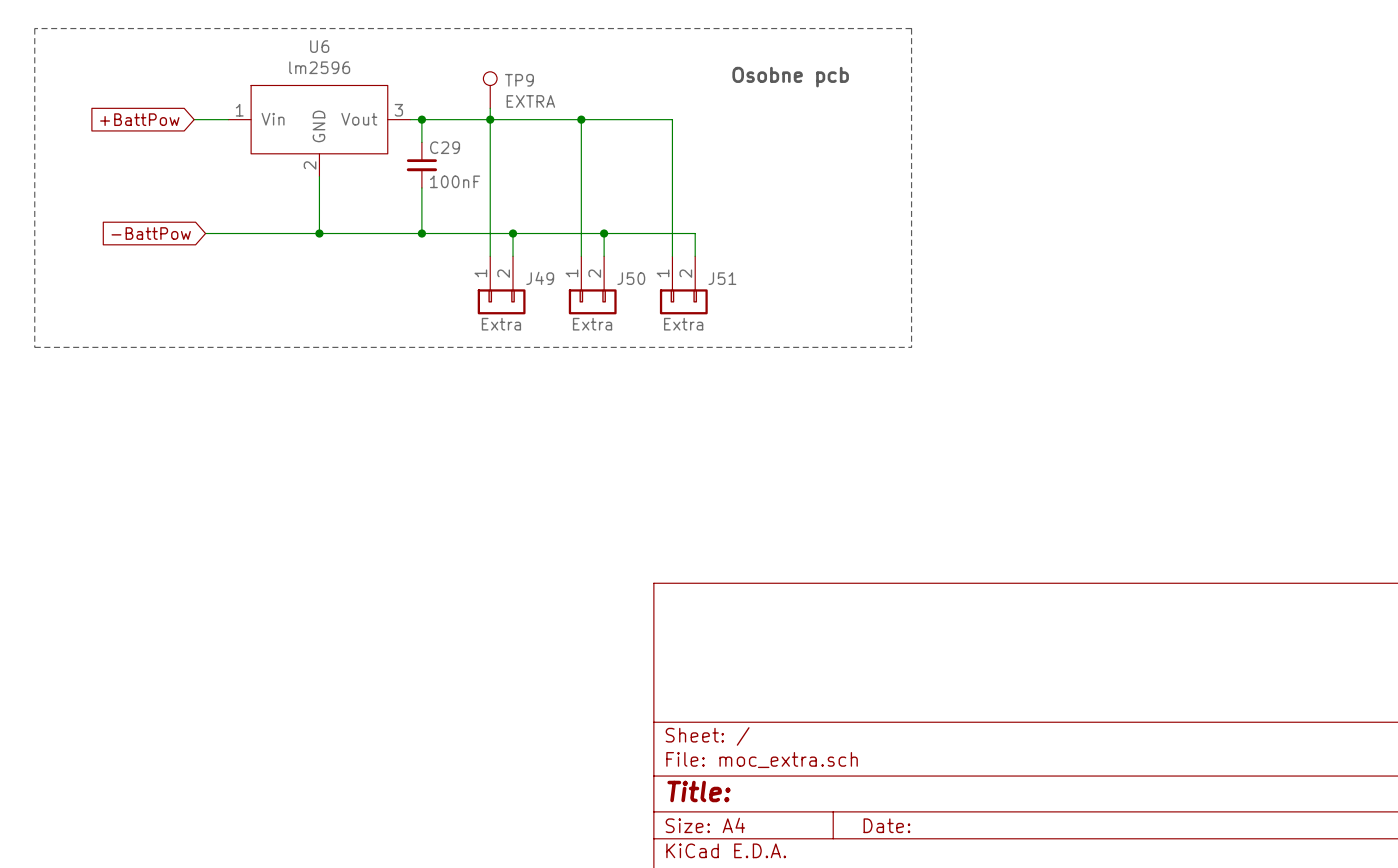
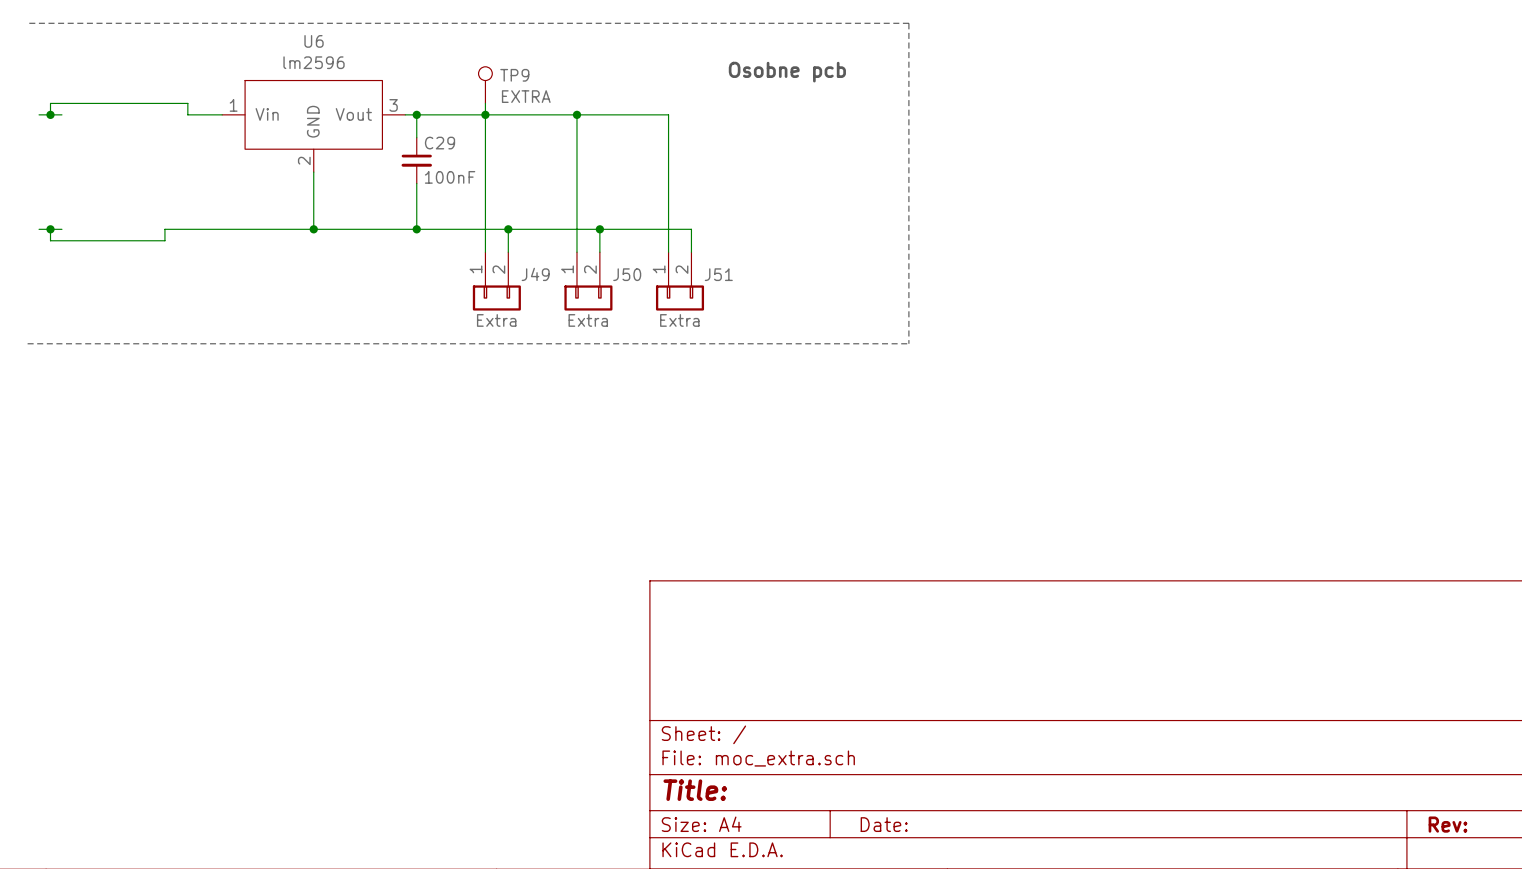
line: (34, 28) (34, 347) -> none
wire: none -> (39, 114) (61, 114)
wire: none -> (50, 114) (50, 103) (187, 103) (187, 114)
junction: none -> (50, 114)
global label: +BattPow (139, 119) -> none
wire: none -> (39, 229) (61, 229)
wire: none -> (50, 229) (50, 240) (164, 240) (164, 229) (199, 229)
junction: none -> (50, 229)
global label: -BattPow (151, 233) -> none

